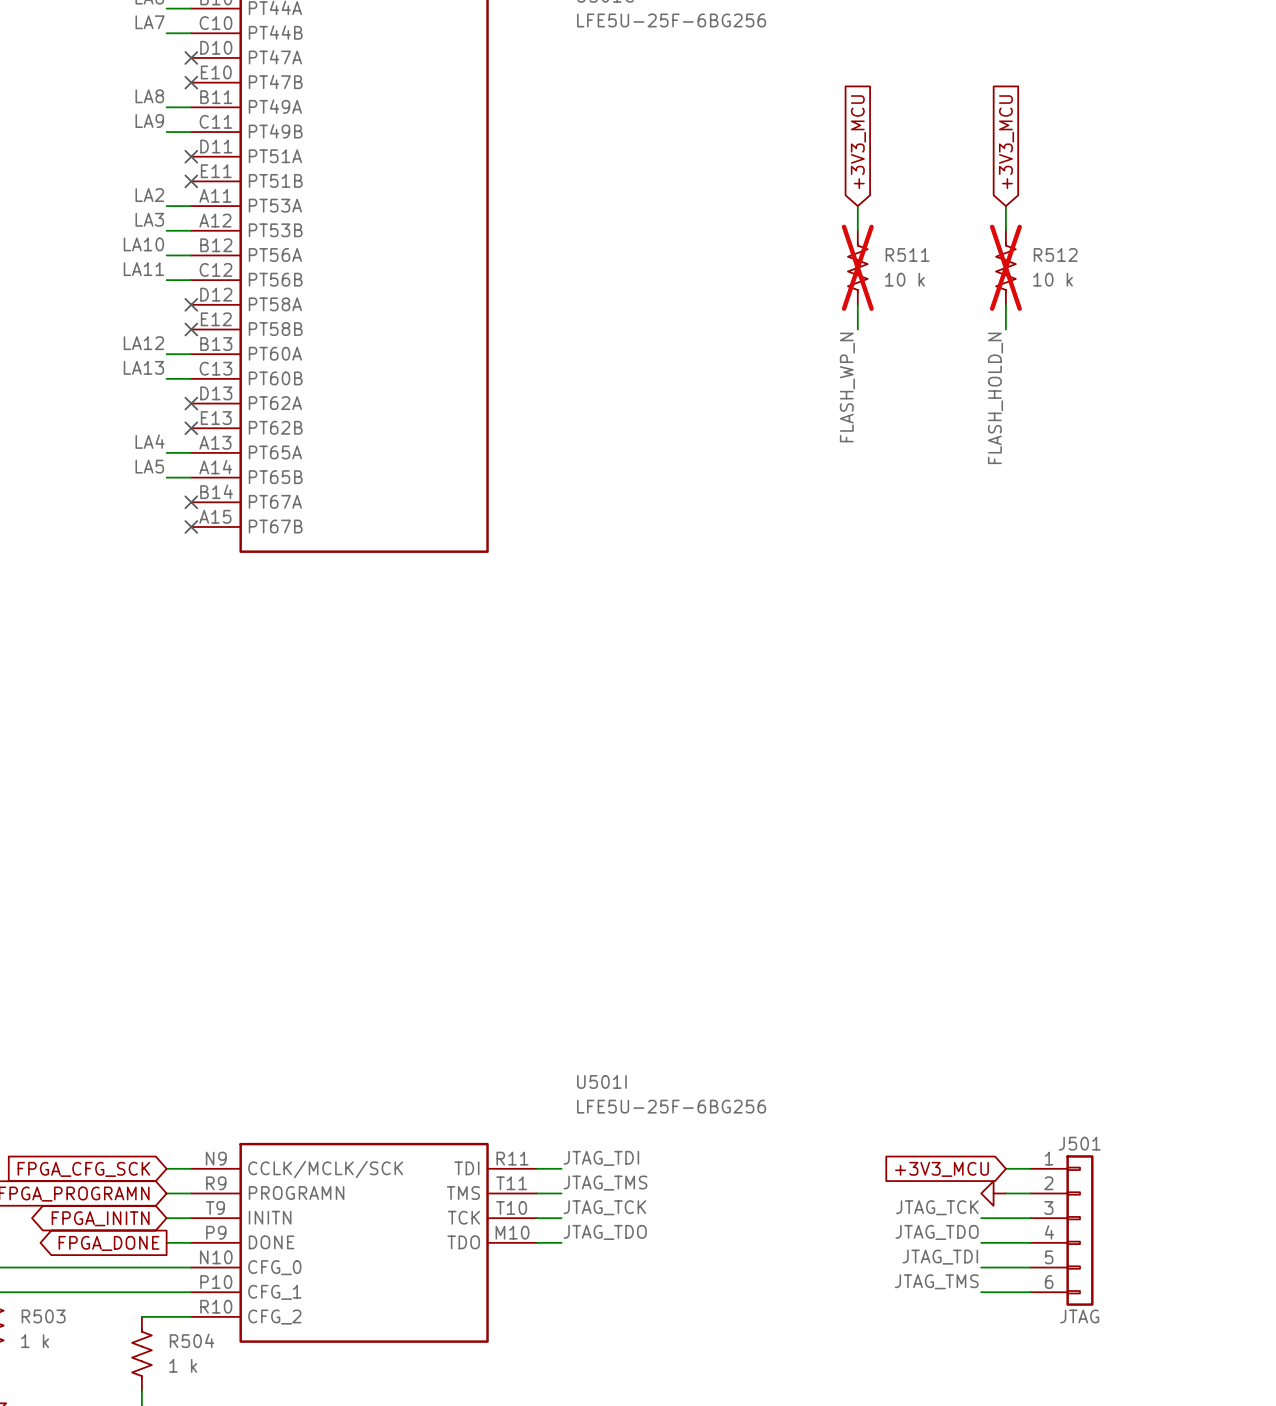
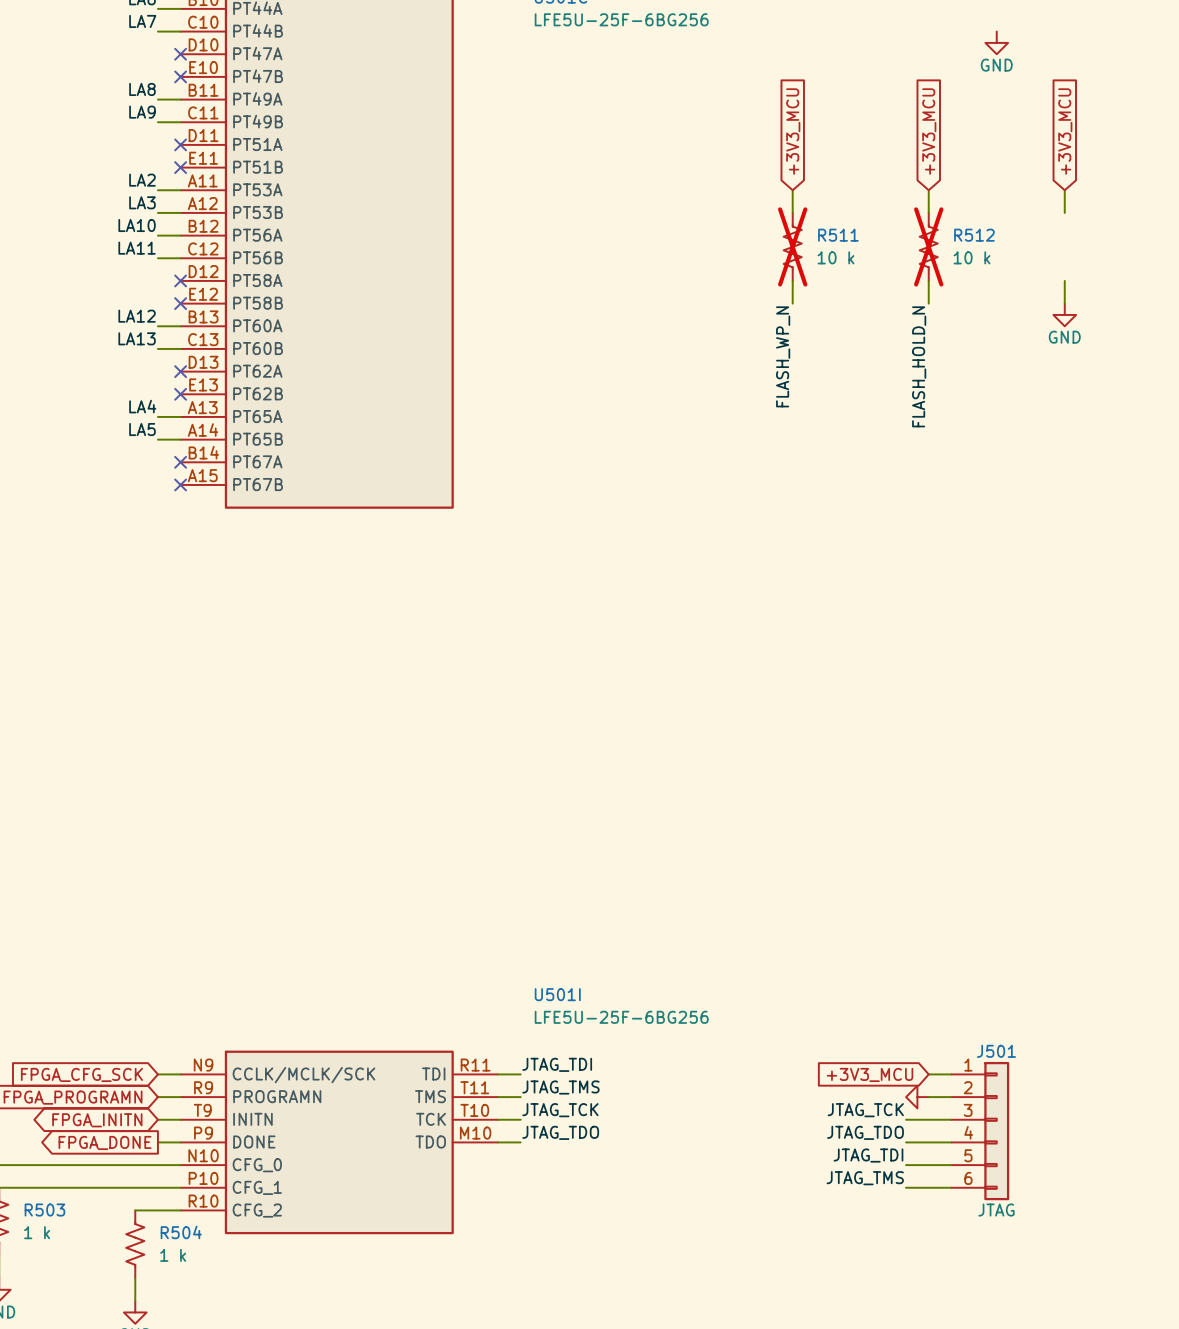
power symbol: none -> GND (996, 42)
global label: none -> +3V3_MCU (1065, 131)
wire: none -> (1064, 190) (1064, 212)
wire: none -> (1064, 280) (1064, 303)
power symbol: none -> GND (1064, 314)

